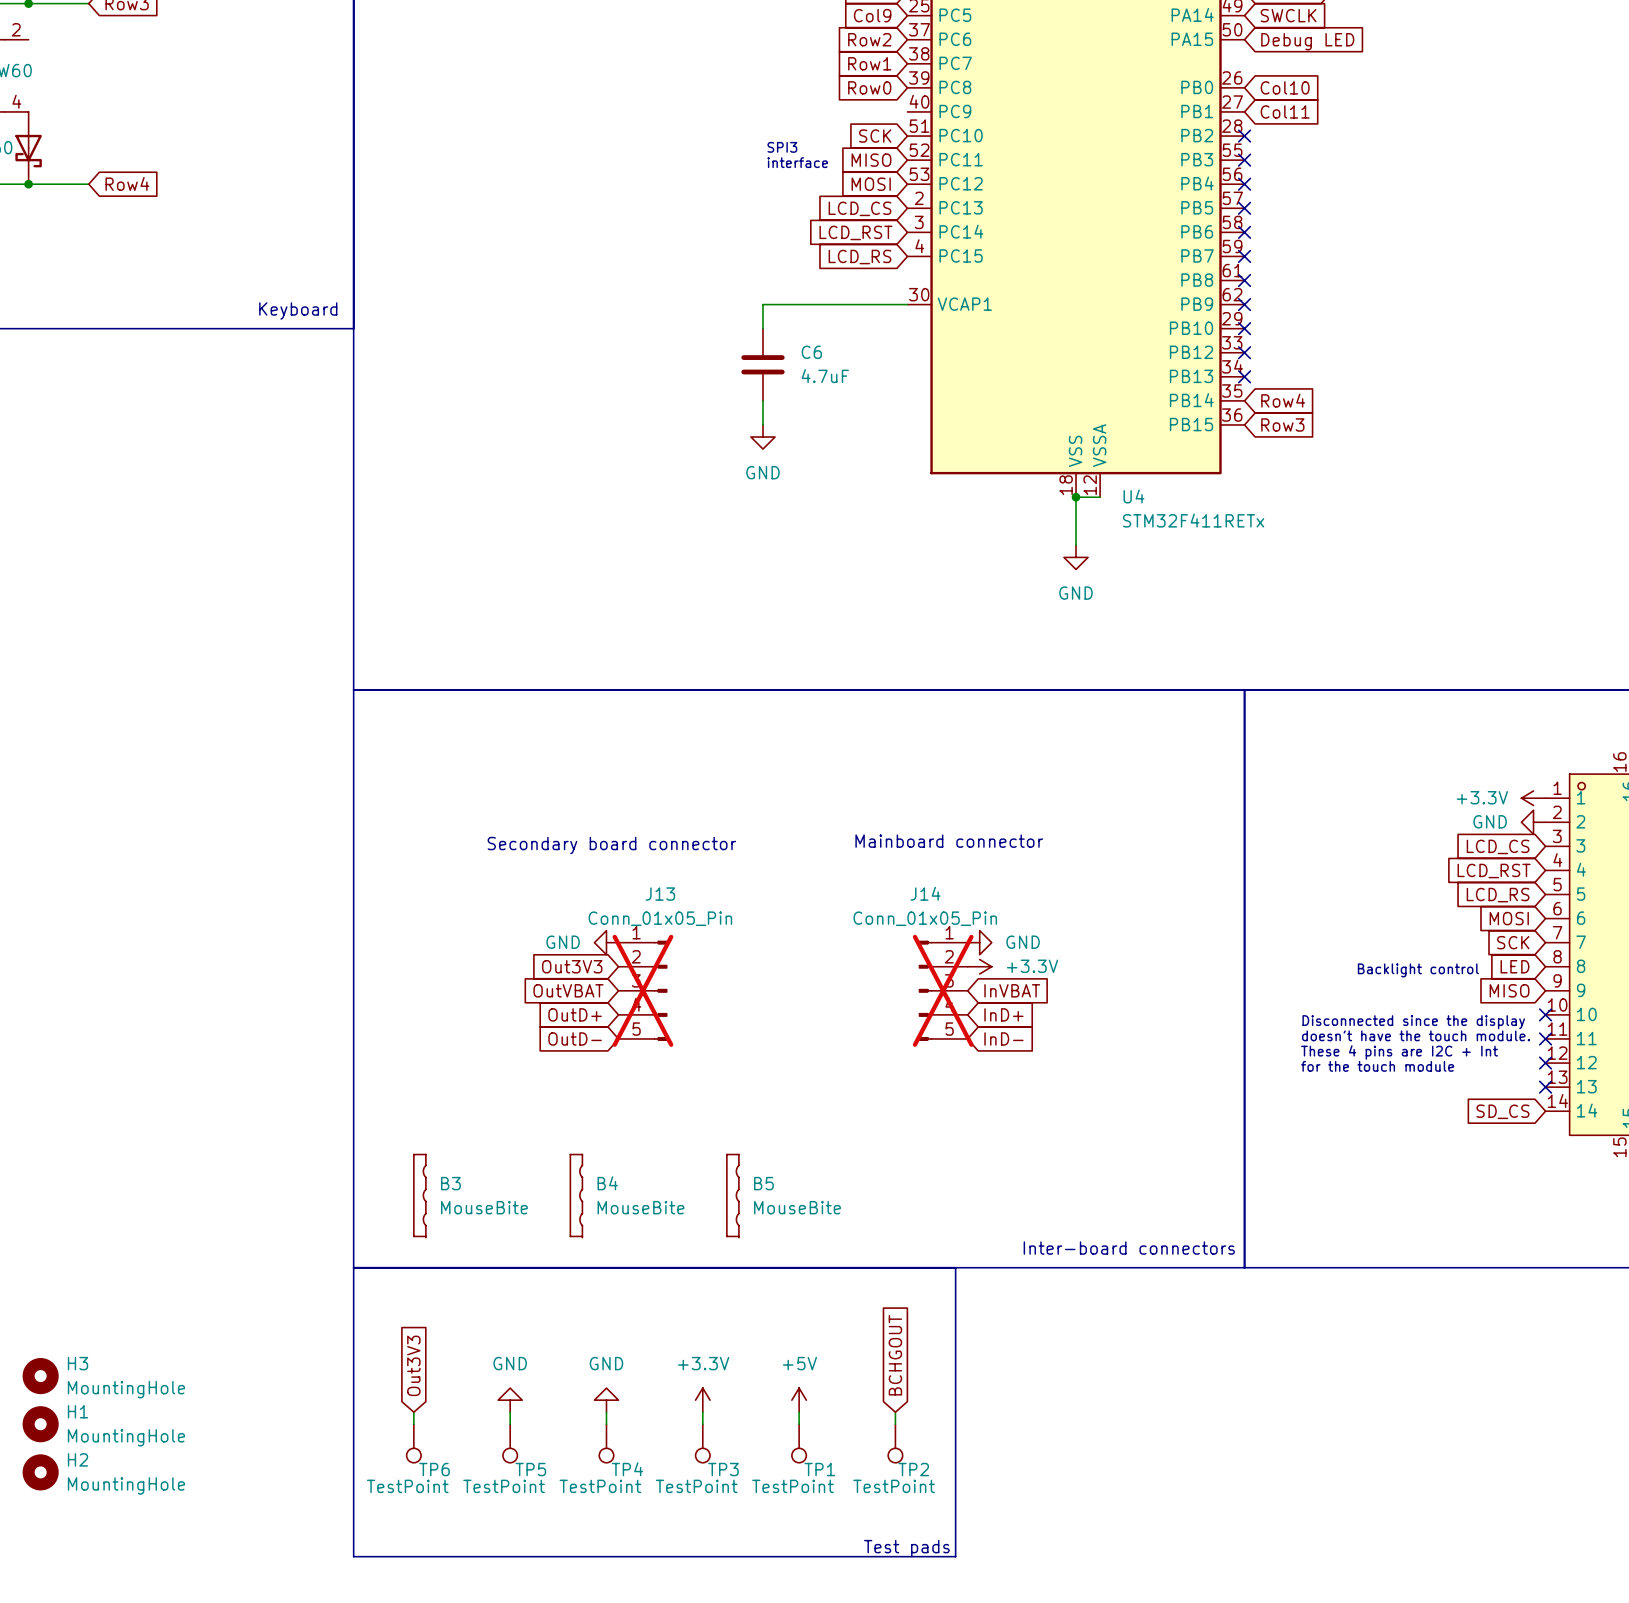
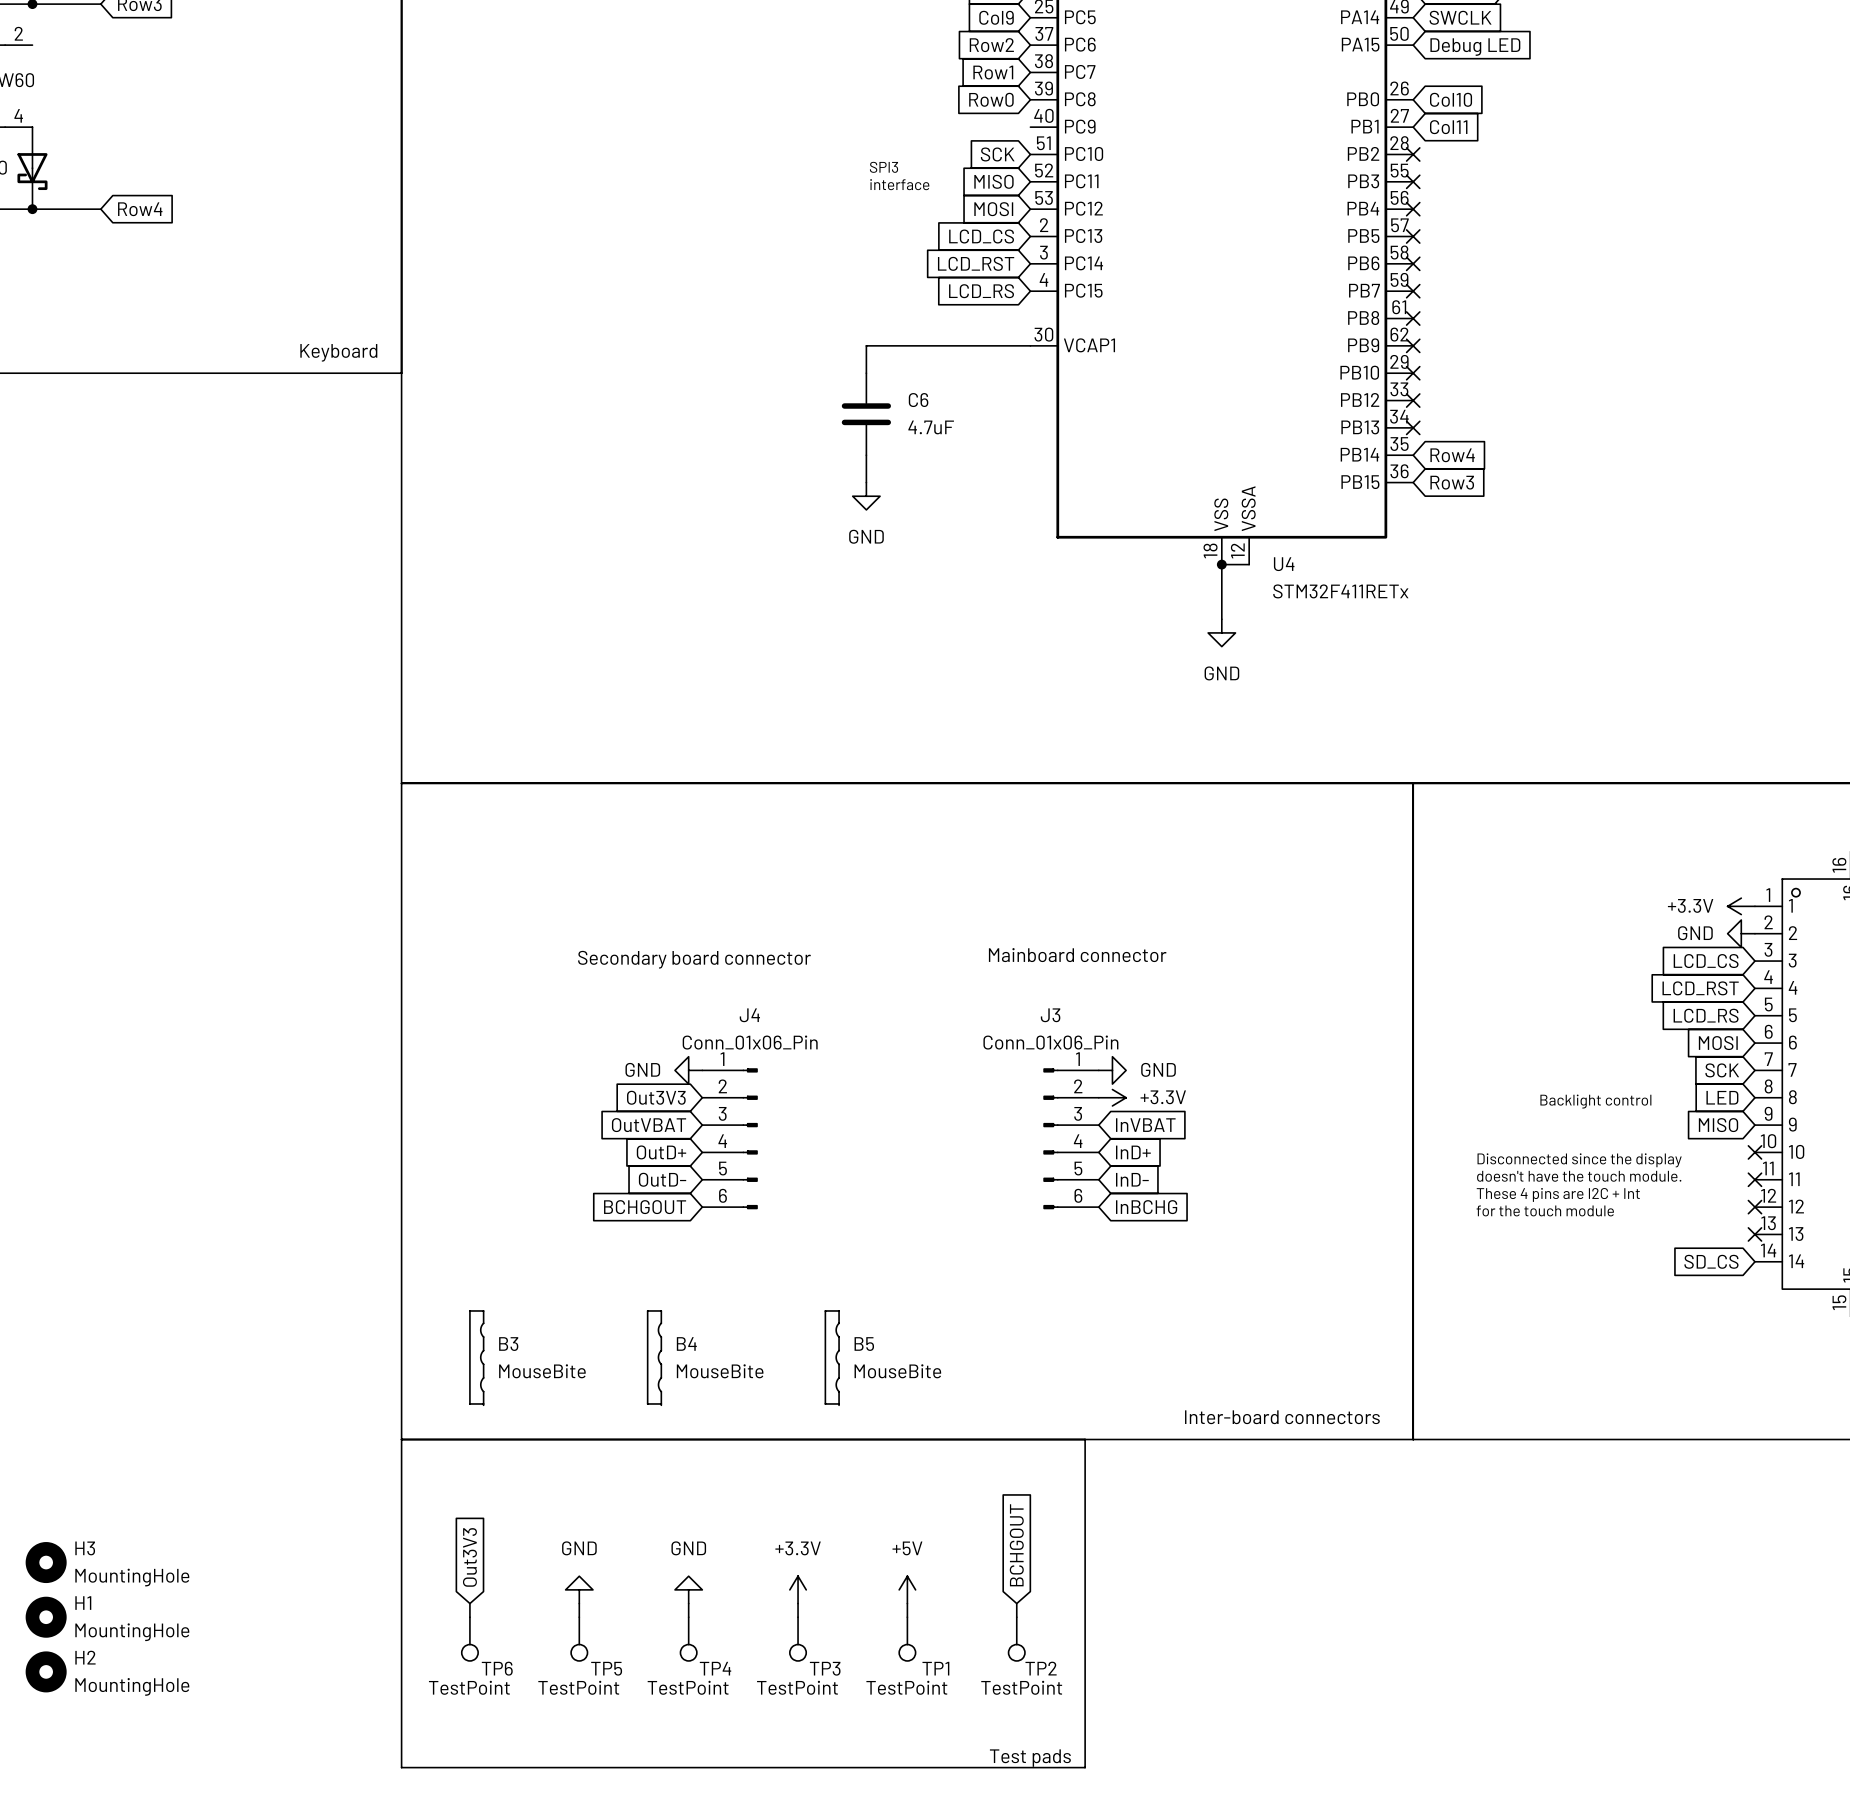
J13: Conn_01x05_Pin (642, 990) -> none
J14: Conn_01x05_Pin (943, 990) -> none
J4: none -> Conn_01x06_Pin (730, 1138)
J3: none -> Conn_01x06_Pin (1071, 1138)
global label: none -> BCHGOUT (645, 1207)
global label: none -> InBCHG (1146, 1207)

